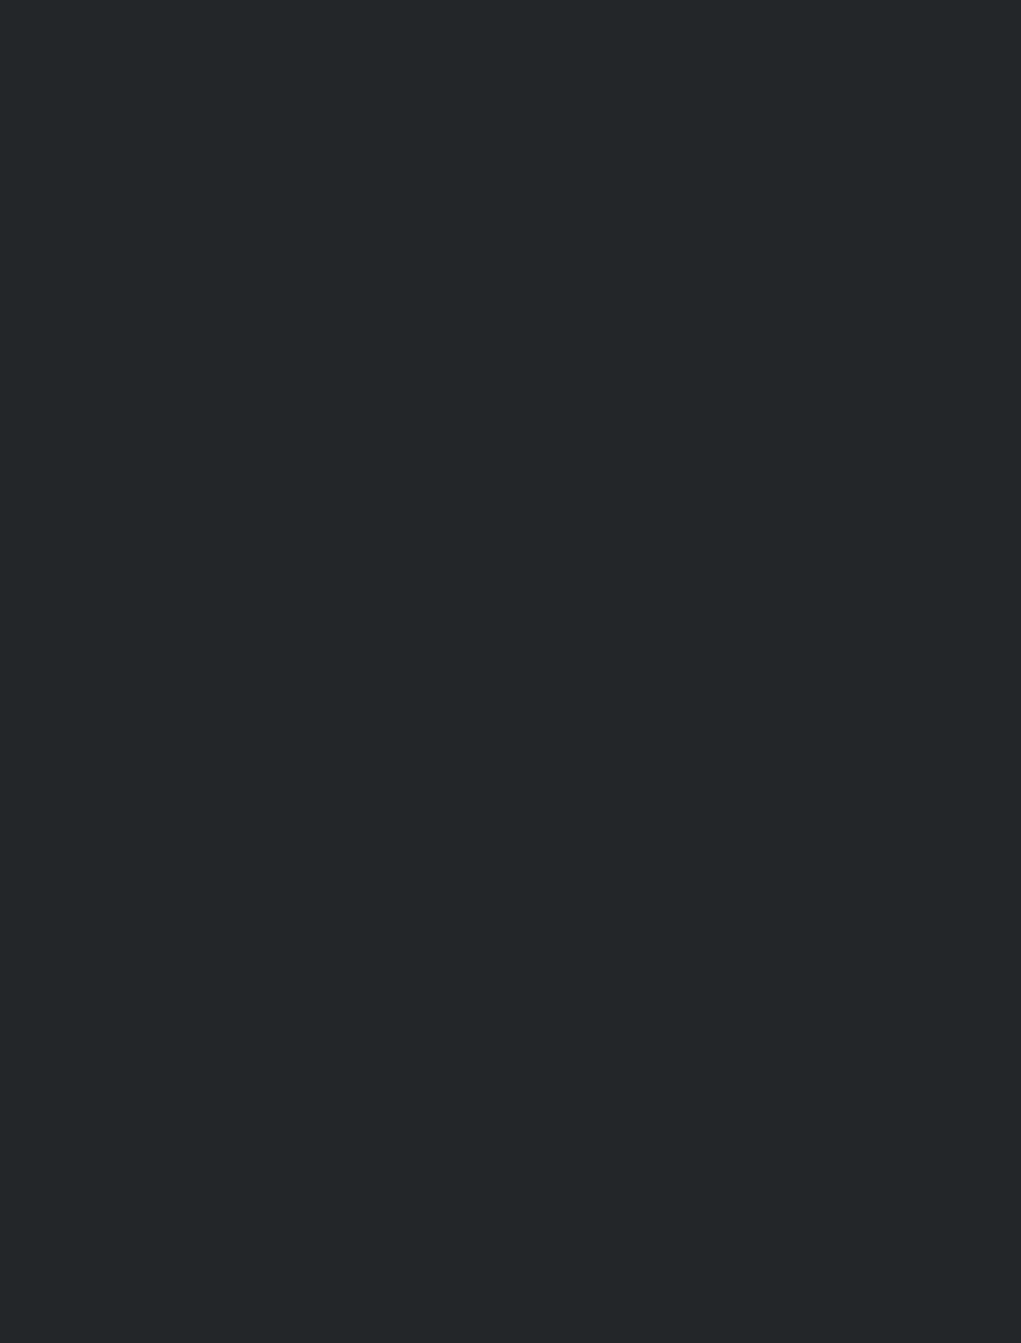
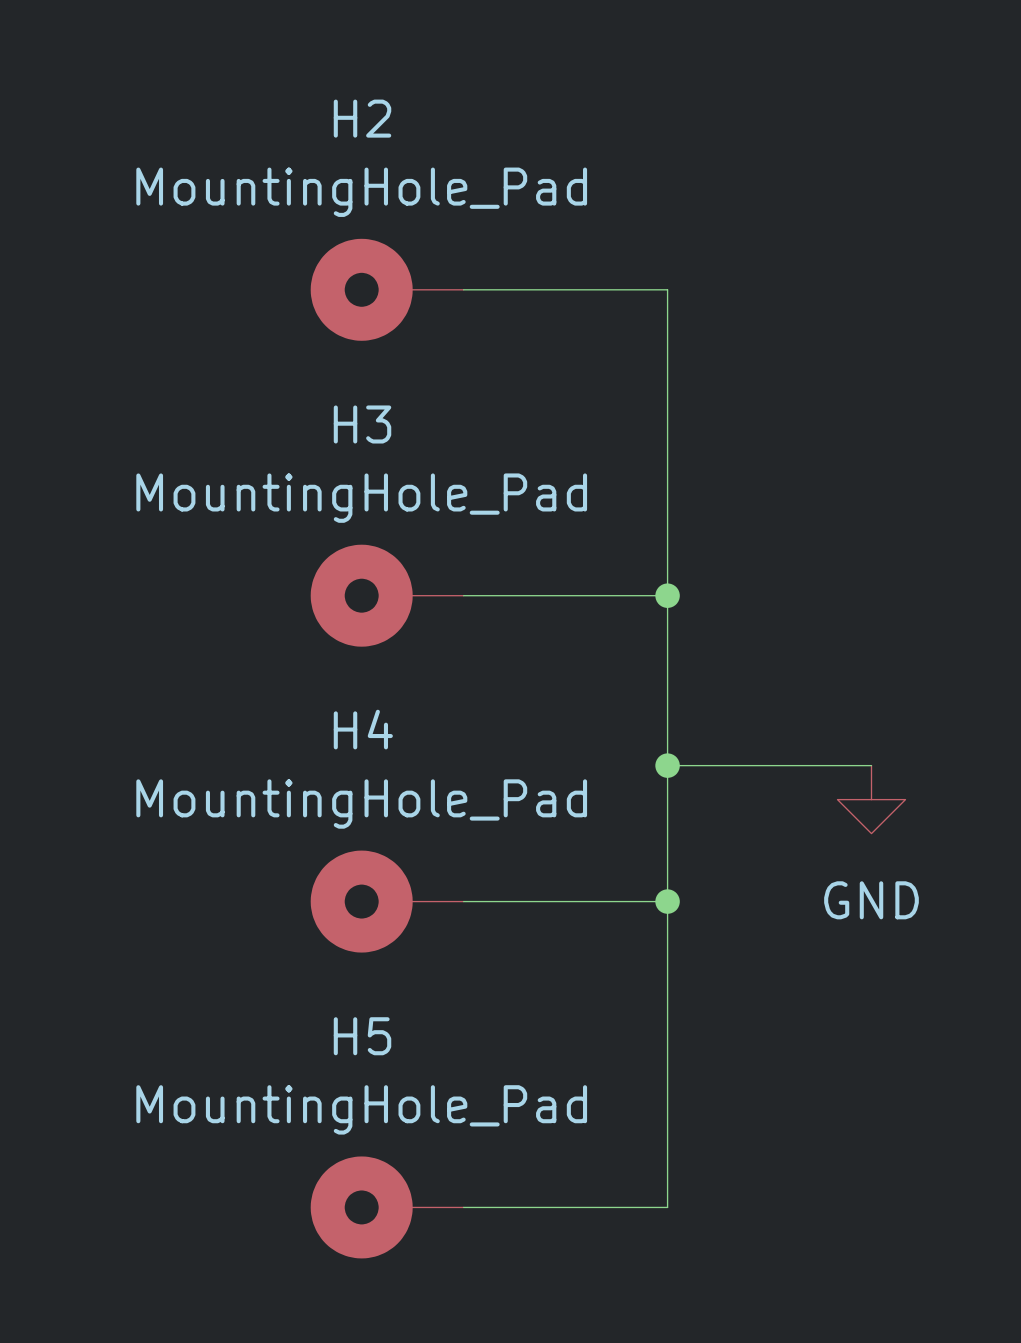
H2: none -> MountingHole_Pad (387, 289)
wire: none -> (463, 289) (667, 289) (667, 1207) (463, 1207)
H3: none -> MountingHole_Pad (387, 595)
wire: none -> (463, 595) (667, 595)
junction: none -> (667, 595)
wire: none -> (667, 765) (871, 765)
junction: none -> (667, 765)
power symbol: none -> GND (871, 799)
H4: none -> MountingHole_Pad (387, 901)
wire: none -> (463, 901) (667, 901)
junction: none -> (667, 901)
H5: none -> MountingHole_Pad (387, 1207)

